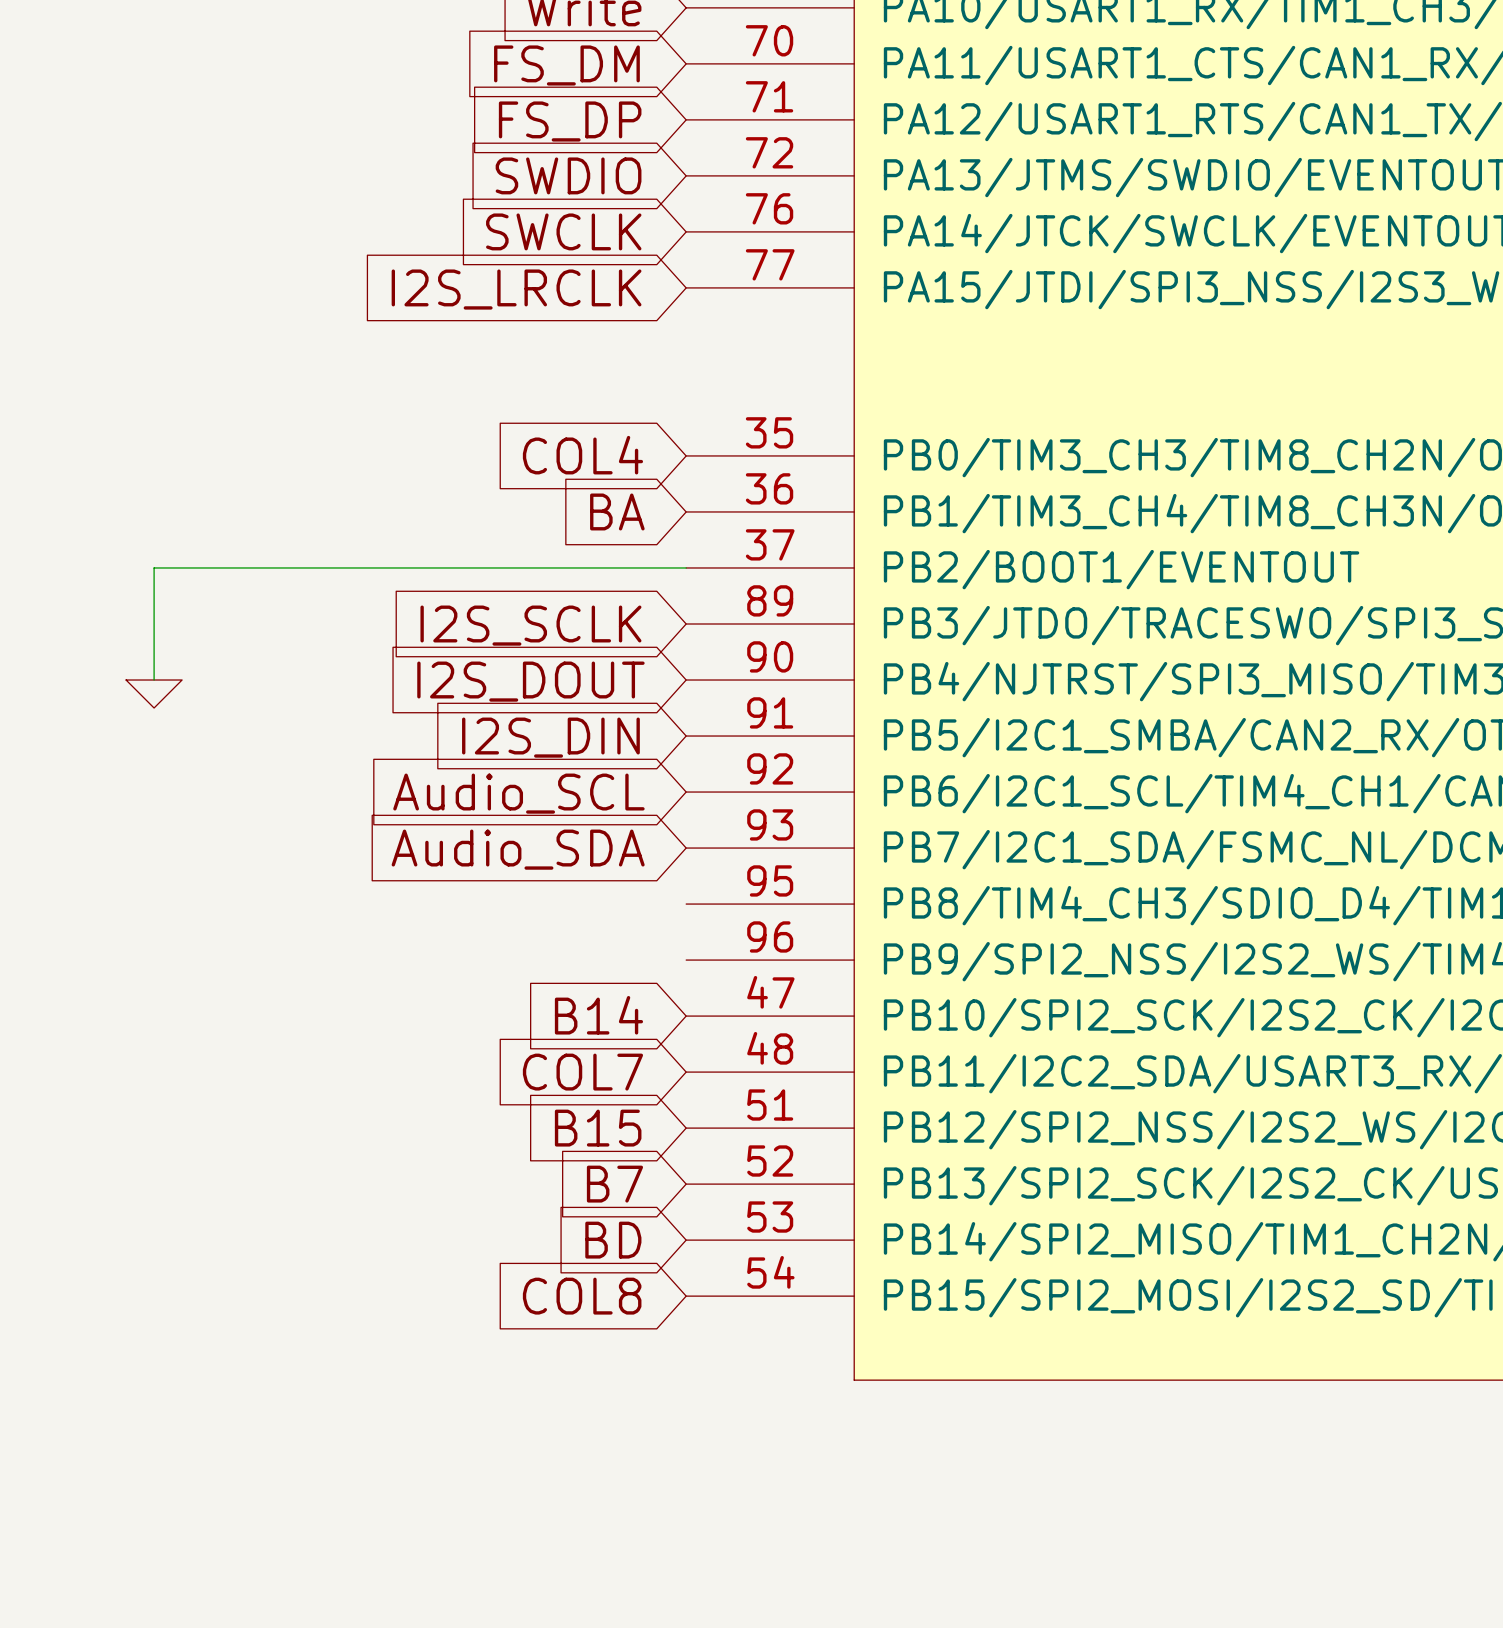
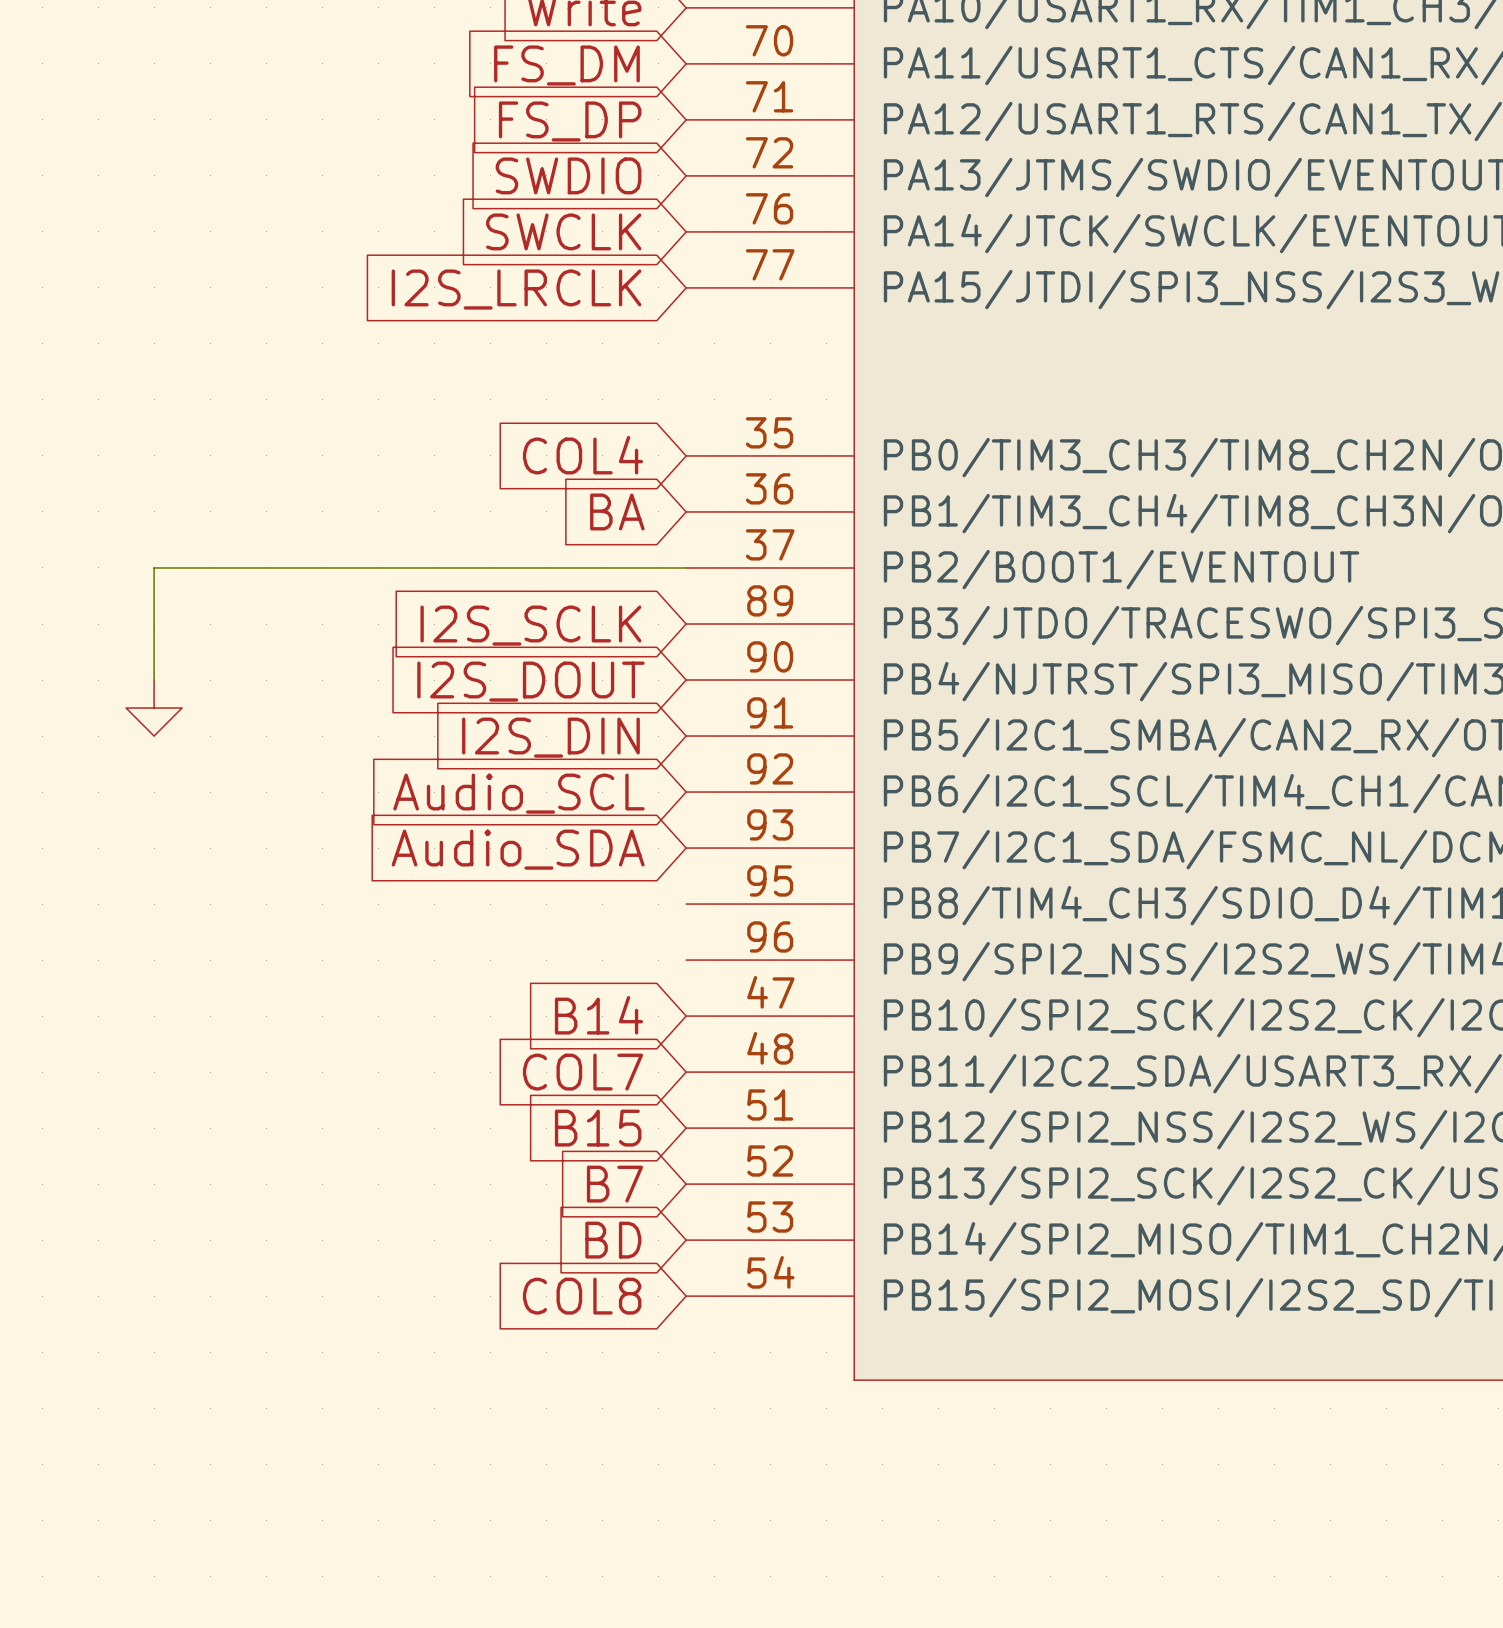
power symbol shape: [126, 680, 183, 709] -> [126, 680, 183, 737]

